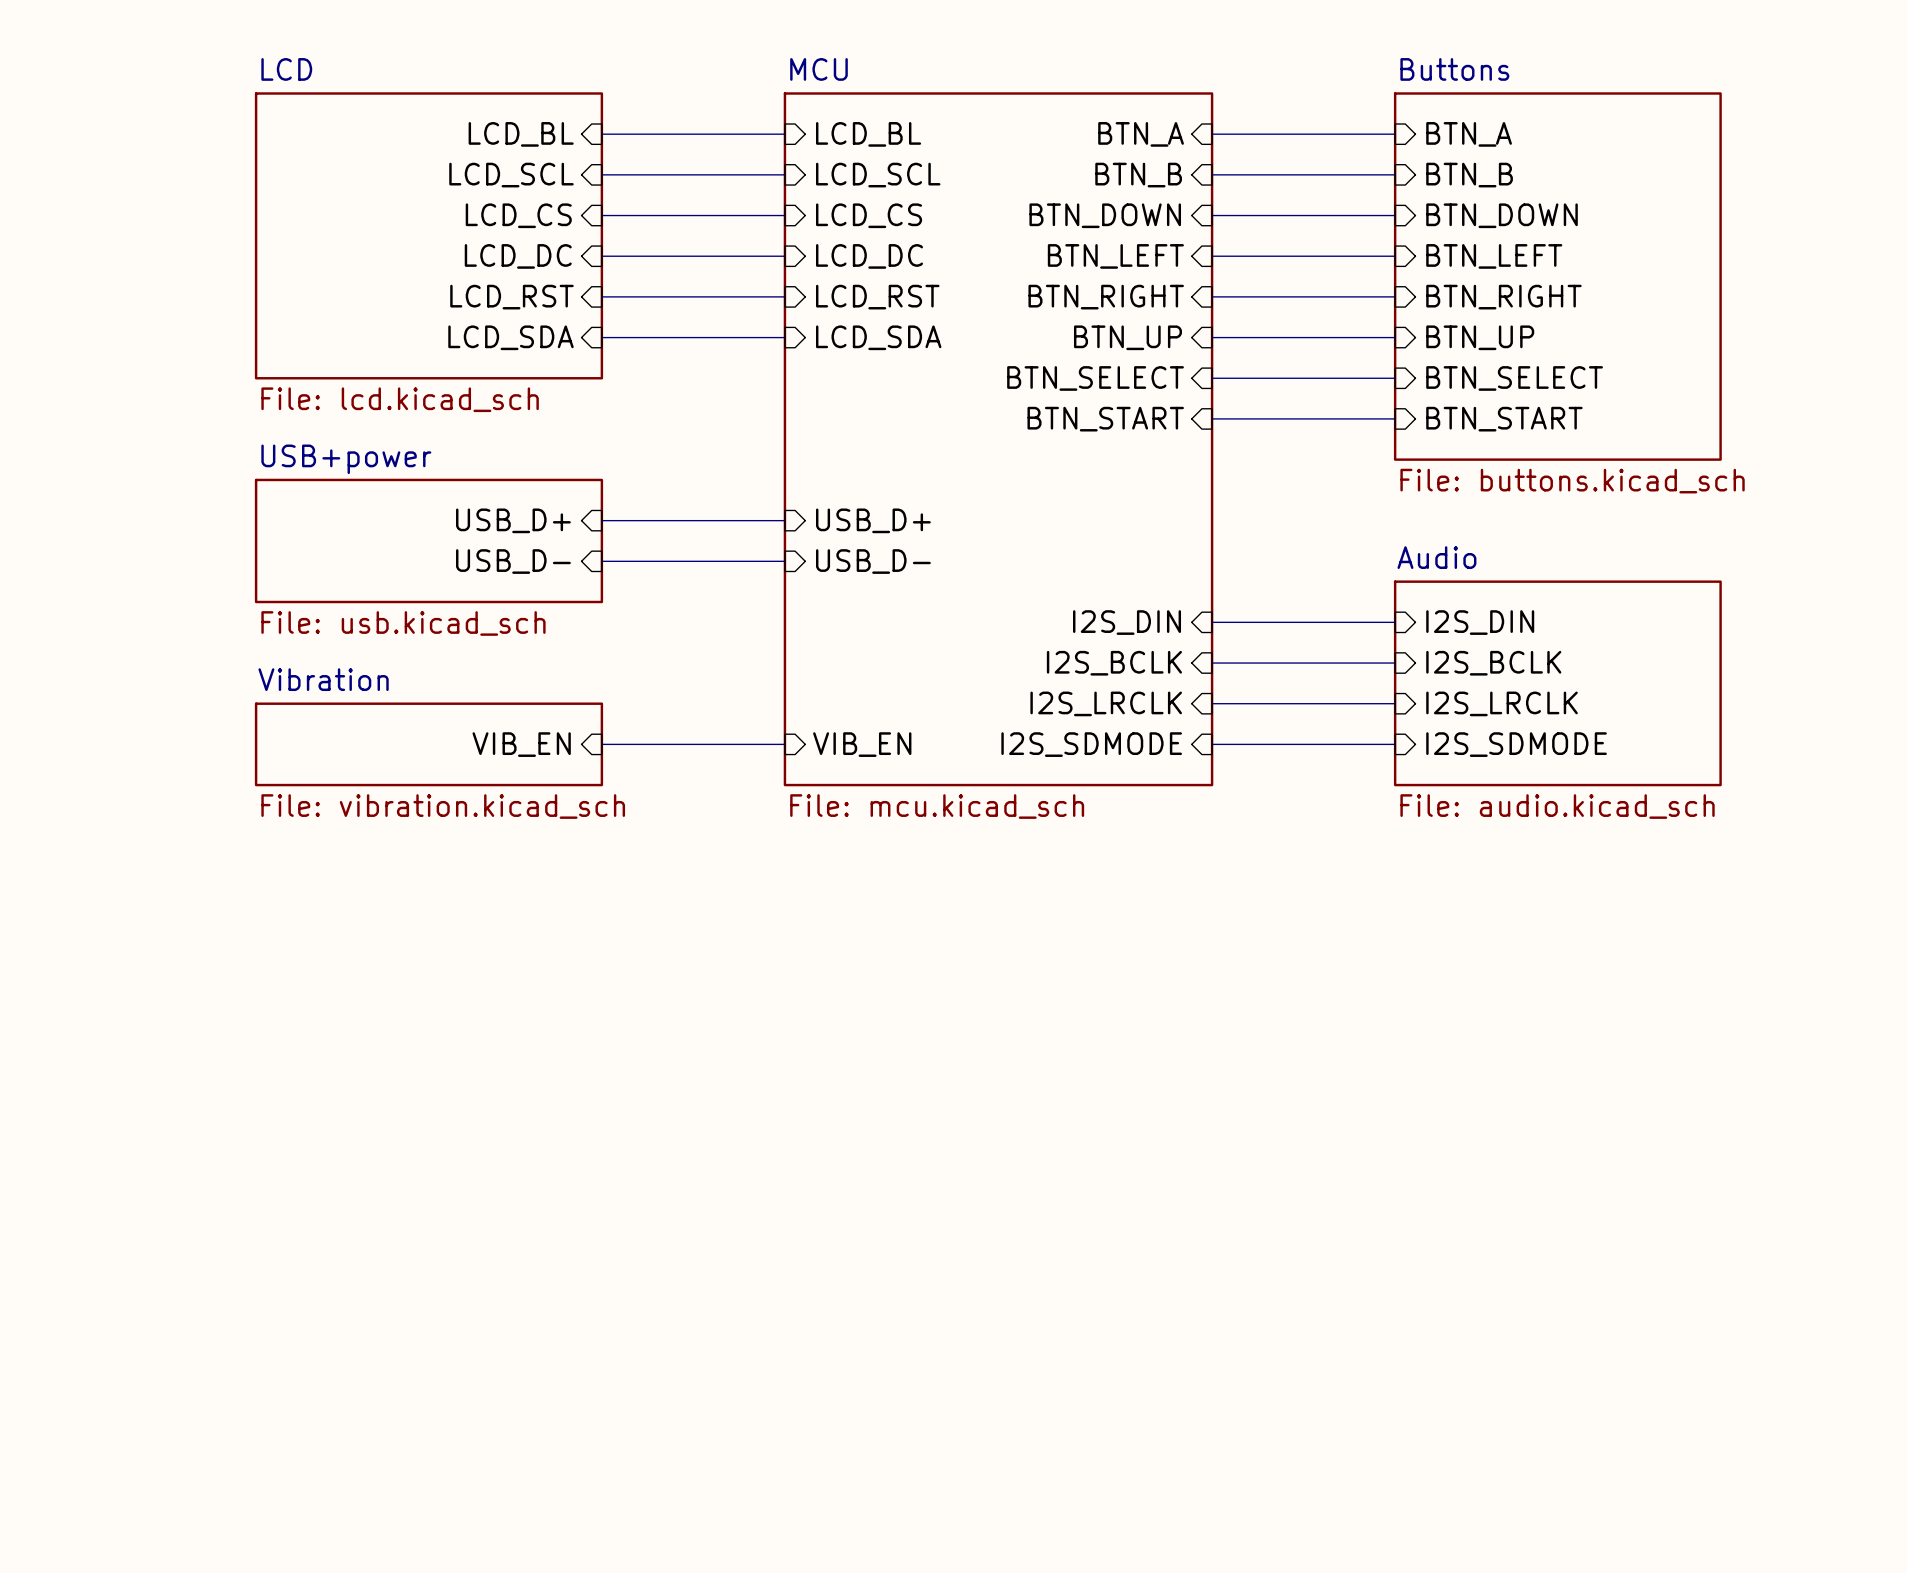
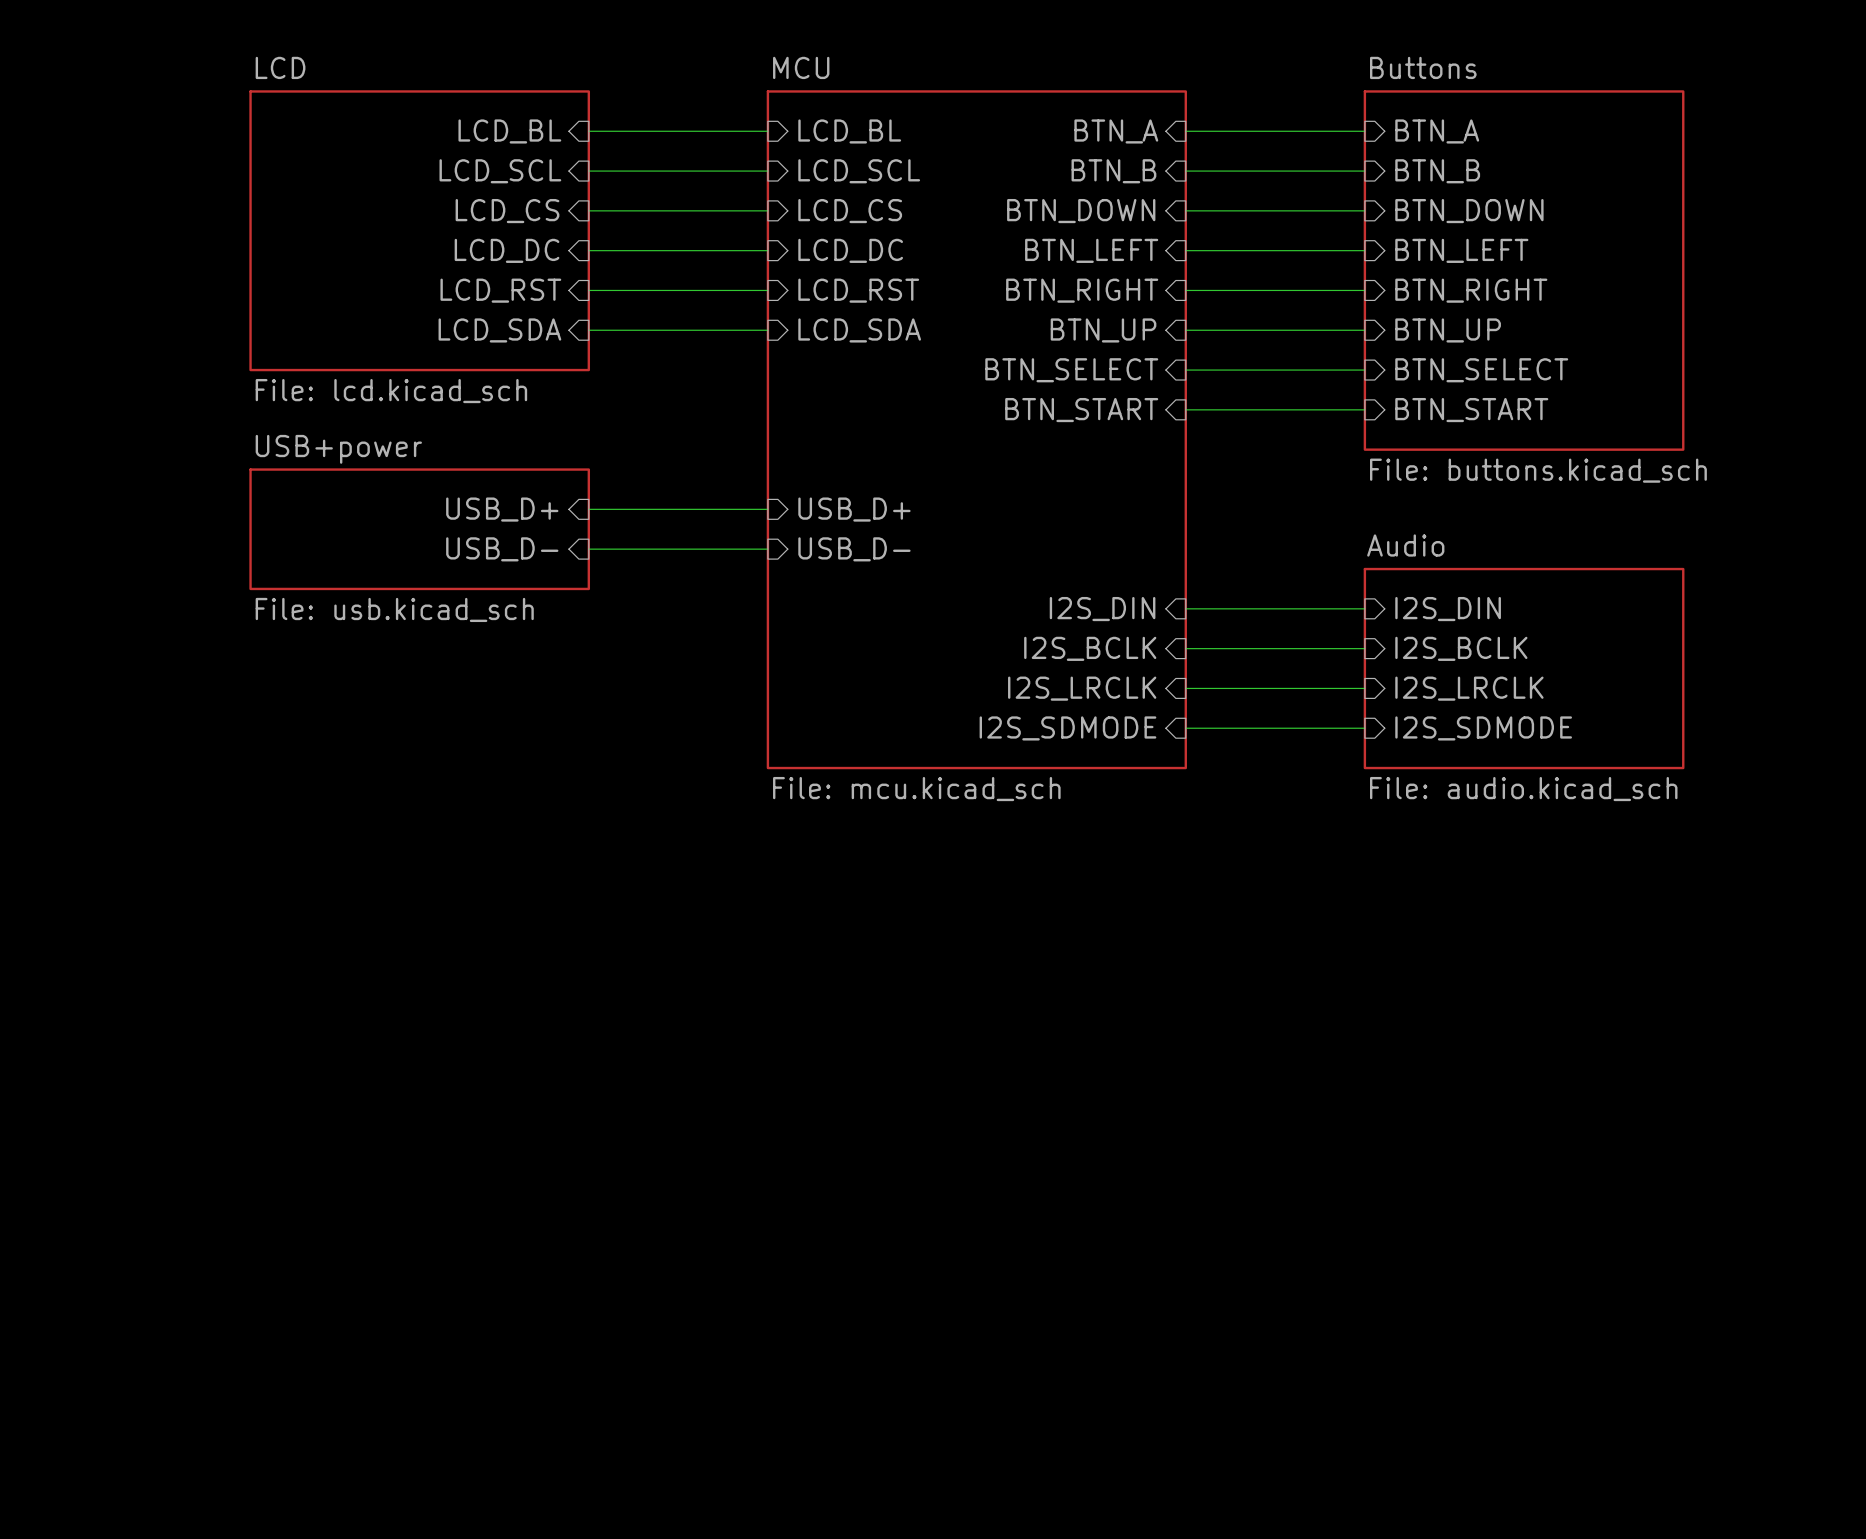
sheet Vibration: File: vibration.kicad_sch (428, 744) -> none
sheet pin: VIB_EN (521, 744) -> none
wire: (601, 744) (784, 744) -> none
sheet pin: VIB_EN (862, 744) -> none

